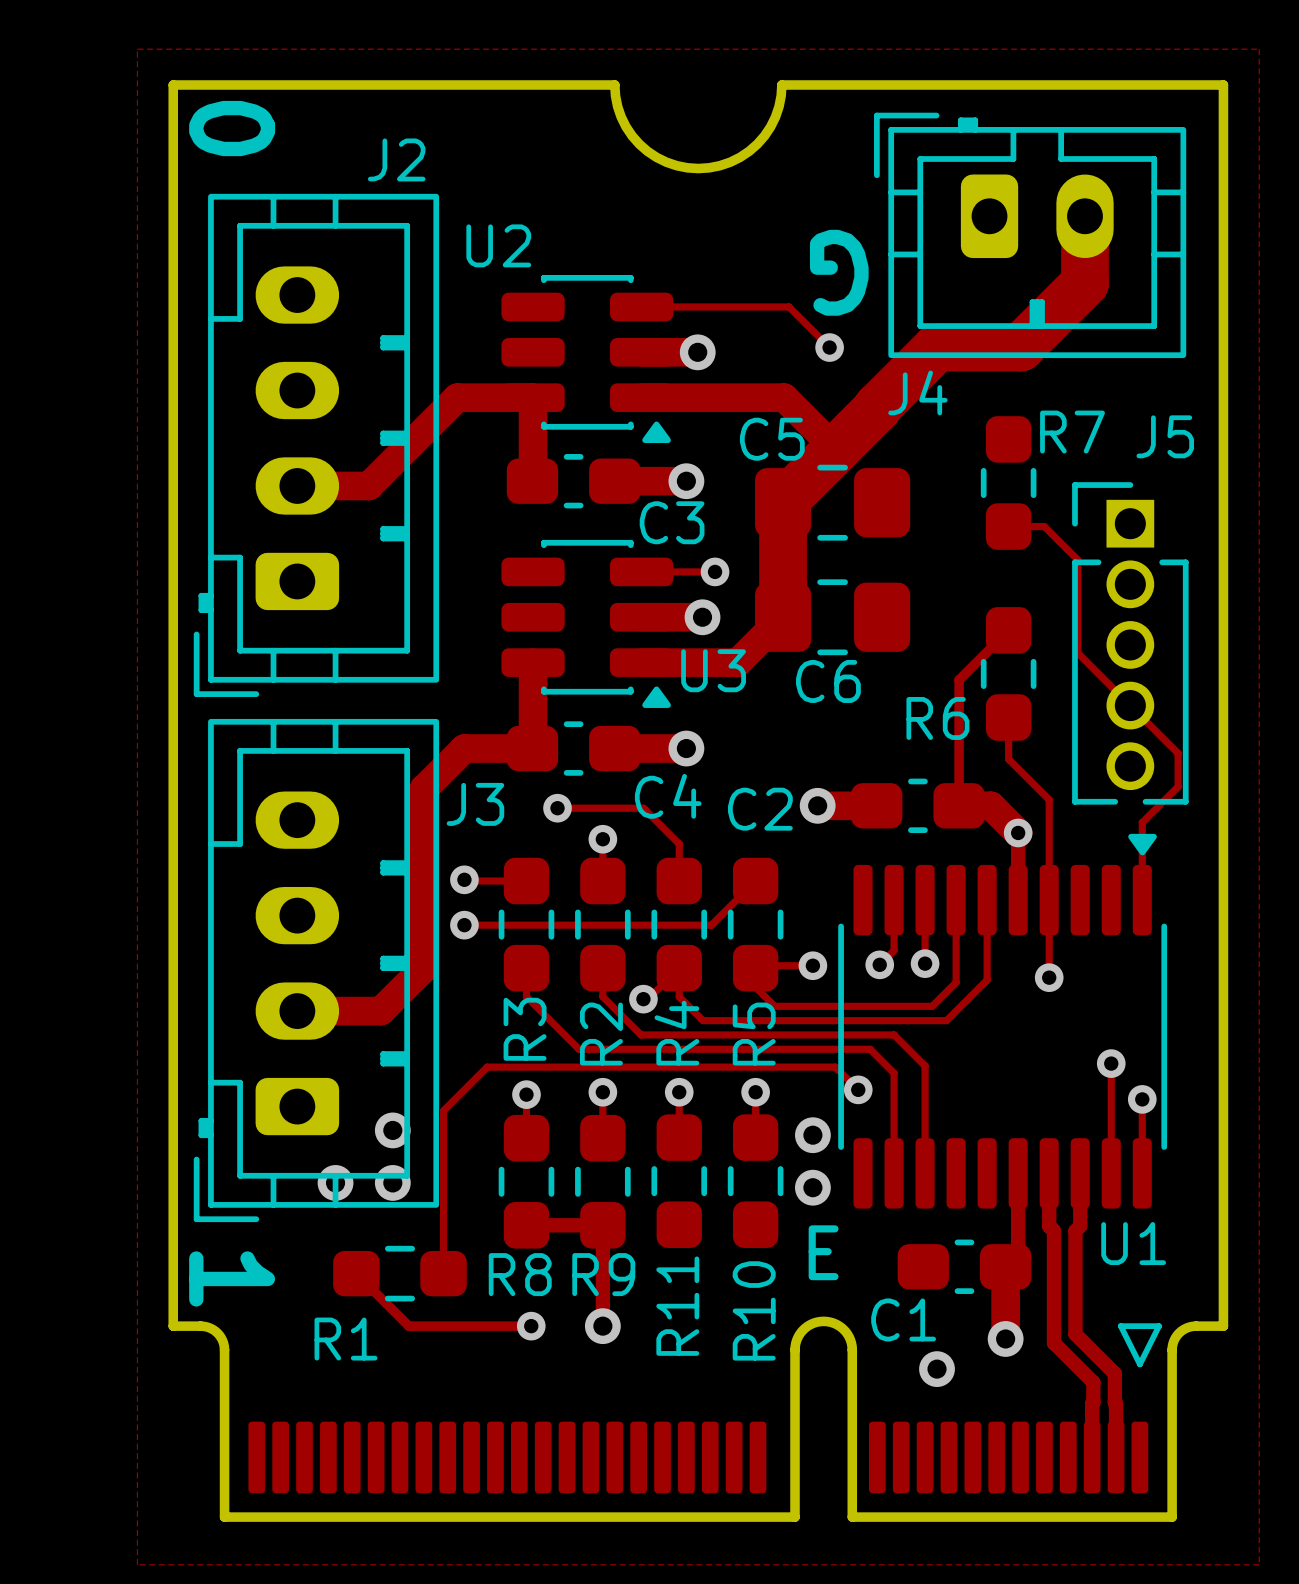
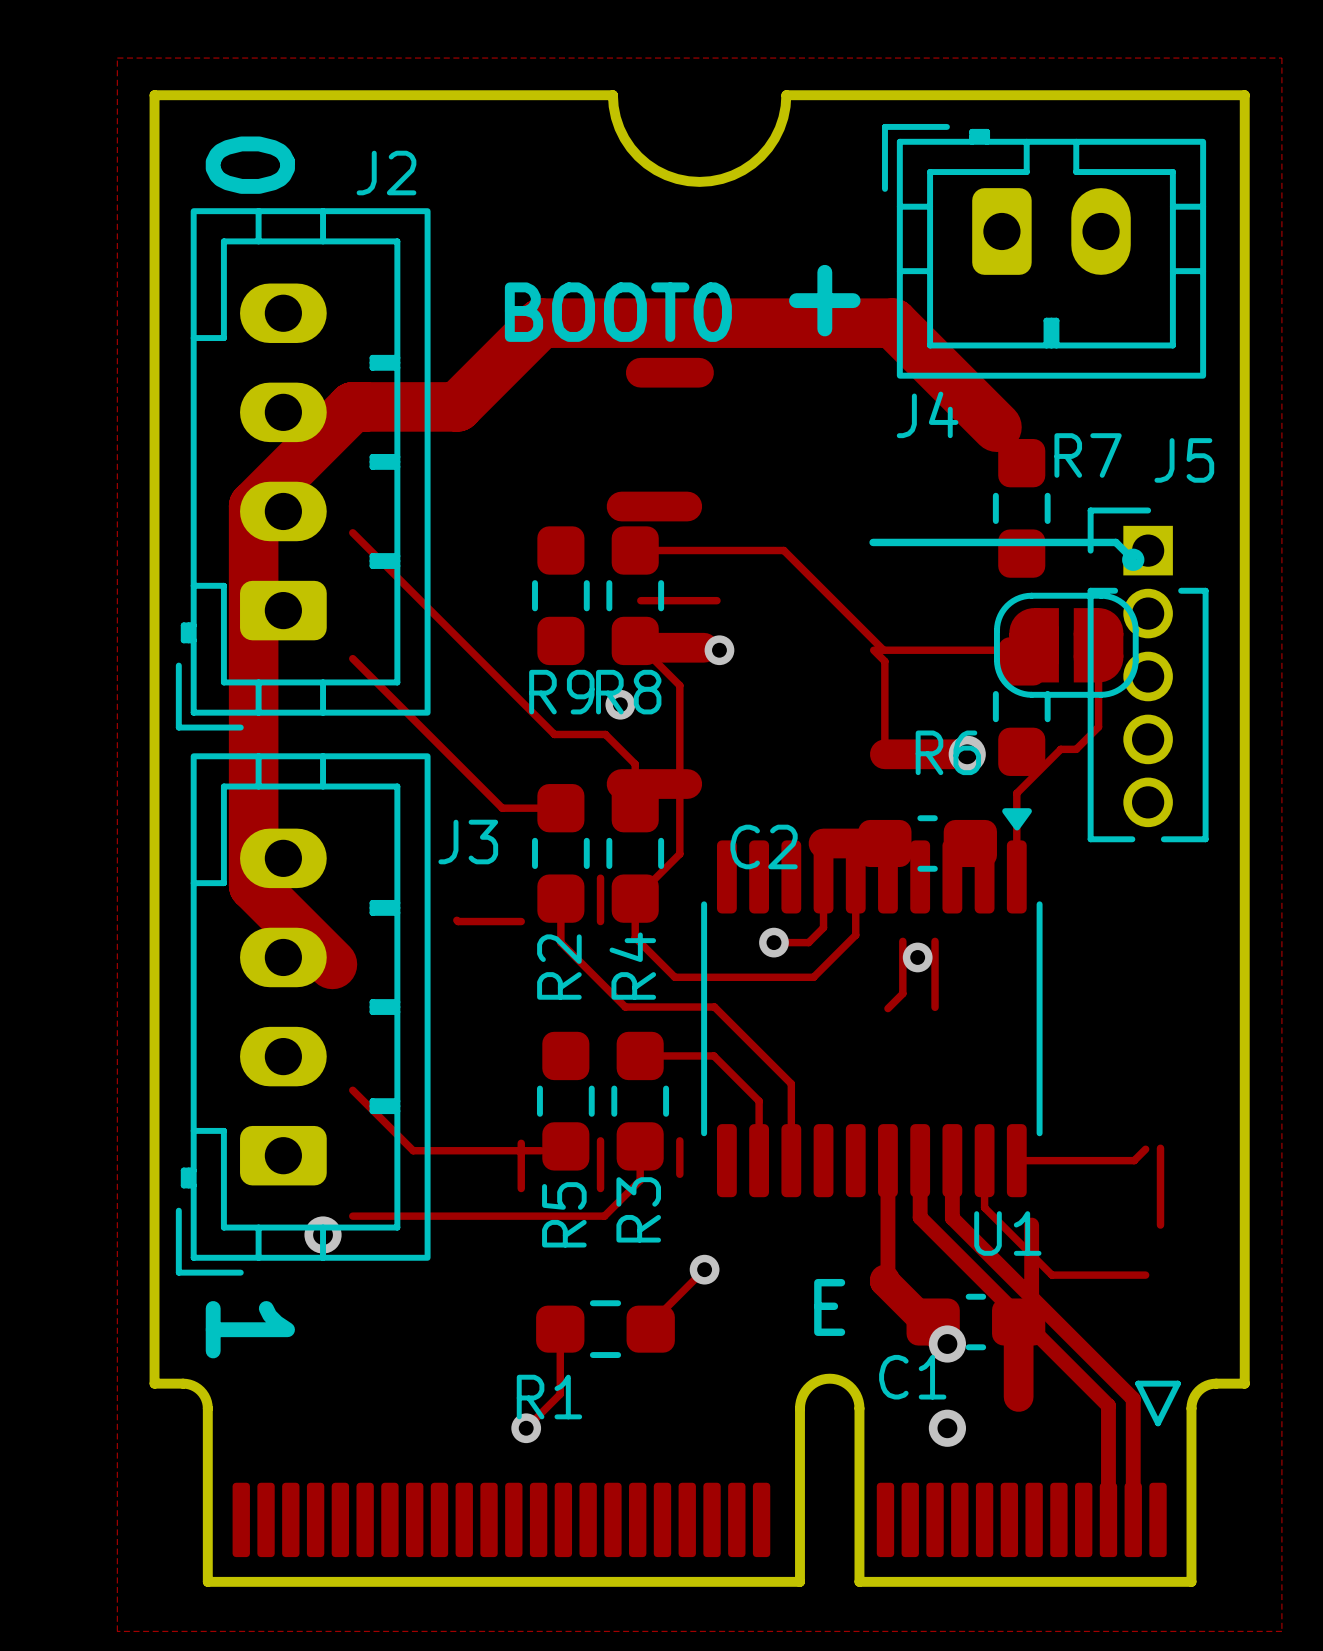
text position: 0 (232, 128) -> 0 (250, 165)
track: (1085, 216) (1085, 283) (1020, 347) (937, 347) (783, 502) (783, 617) (737, 662) (641, 662) -> none
text: G (839, 272) -> none
text: none -> + (824, 300)
text: none -> BOOT0 (618, 312)
track: (641, 306) (789, 306) (829, 347) -> none
via: (829, 347) -> none
via: (697, 352) -> none
U2: (587, 359) -> none
track: (641, 397) (784, 397) (836, 449) -> none
track: none -> (996, 427) (892, 323) (541, 323) (457, 406) (352, 406) (253, 506) (253, 885) (332, 964)
track: (533, 481) (533, 397) (457, 397) (368, 485) (297, 485) -> none
C3: (573, 481) -> none
via: (686, 481) -> none
C5: (832, 502) -> none
track: none -> (352, 532) (554, 734) (605, 734) (635, 764) (635, 808)
line: none -> (873, 542) (1115, 542) (1133, 559)
drawing: none -> [1122, 548, 1145, 571]
track: none -> (635, 550) (783, 550) (883, 650) (1029, 650) (1034, 645)
track: (1008, 526) (1044, 526) (1077, 559) (1077, 653) (1178, 753) (1178, 786) (1142, 822) (1142, 900) -> none
via position: (715, 571) -> (719, 650)
track: none -> (1098, 625) (1098, 727) (1076, 749) (1060, 749) (1016, 793) (1016, 876)
track: none -> (635, 640) (679, 685) (679, 854) (635, 898) (635, 937) (674, 977) (813, 977) (855, 935) (855, 876)
part: none -> (1066, 645)
via: (702, 617) -> none
C6: (832, 617) -> none
track: none -> (873, 650) (884, 661) (884, 754) (967, 754)
U3: (587, 623) -> none
track: none -> (352, 658) (502, 808) (560, 808)
track: (1008, 630) (959, 679) (959, 805) (991, 805) (1018, 832) (1018, 900) -> none
track: (533, 662) (533, 748) (464, 748) (423, 789) (423, 968) (380, 1011) (297, 1011) -> none
via: none -> (620, 704)
track: (1008, 717) (1008, 759) (1049, 799) (1049, 977) -> none
via: none -> (967, 754)
C4: (573, 748) -> none
via: (686, 748) -> none
via: (817, 805) -> none
track: (557, 808) (643, 808) (679, 844) (679, 881) -> none
via: (557, 808) -> none
via: (1018, 832) -> none
track: none -> (823, 876) (823, 927) (808, 942) (773, 942)
via: (602, 839) -> none
track: none -> (560, 898) (560, 942) (625, 1007) (714, 1007) (791, 1083) (791, 1160)
via: (464, 879) -> none
track: (755, 881) (711, 925) (464, 925) -> none
track: (956, 900) (956, 982) (932, 1006) (774, 1006) (755, 987) (755, 968) (758, 965) (812, 965) -> none
track: (987, 900) (987, 980) (946, 1020) (703, 1020) (679, 996) (679, 968) (648, 999) (643, 999) -> none
via: none -> (773, 942)
via: none -> (917, 957)
R3 position: (526, 924) -> (640, 1101)
R2 position: (602, 924) -> (560, 853)
R4 position: (679, 924) -> (635, 853)
R5 position: (755, 924) -> (565, 1101)
via: (464, 925) -> none
via: (925, 963) -> none
via: (879, 964) -> none
via: (812, 965) -> none
track: (526, 968) (526, 996) (578, 1049) (870, 1049) (894, 1073) (894, 1173) -> none
track: (602, 968) (602, 996) (641, 1034) (894, 1034) (925, 1065) (925, 1173) -> none
via: (1049, 977) -> none
via: (643, 999) -> none
track: none -> (640, 1055) (713, 1055) (759, 1101) (759, 1140)
U1 position: (1002, 1021) -> (871, 1002)
track: none -> (352, 1090) (413, 1150) (541, 1150)
track: (1111, 1063) (1111, 1173) -> none
via: (1111, 1063) -> none
track: (858, 1089) (835, 1067) (487, 1067) (443, 1110) (443, 1249) -> none
via: (858, 1089) -> none
via: (602, 1092) -> none
via: (679, 1092) -> none
via: (755, 1092) -> none
via: (526, 1094) -> none
track: none -> (640, 1146) (640, 1180) (604, 1216) (352, 1216)
via: (1142, 1099) -> none
track: none -> (1145, 1149) (1134, 1160) (1016, 1160)
track: none -> (887, 1160) (887, 1276) (884, 1281) (947, 1344)
track: none -> (984, 1160) (984, 1207) (1051, 1275) (1145, 1275)
via: (392, 1130) -> none
via: (812, 1135) -> none
track: (1049, 1173) (1049, 1226) (1053, 1230) (1053, 1343) (1093, 1382) (1092, 1403) -> (920, 1160) (920, 1217) (1108, 1405) (1108, 1464)
track: (1080, 1173) (1080, 1226) (1075, 1230) (1075, 1334) (1114, 1373) (1116, 1403) -> (952, 1160) (952, 1218) (1133, 1399) (1133, 1464)
R8 position: (526, 1181) -> (635, 595)
R9 position: (602, 1181) -> (560, 595)
R11: (679, 1181) -> none
R10: (755, 1181) -> none
via: (392, 1182) -> none
via: (812, 1187) -> none
track: none -> (704, 1269) (650, 1323) (650, 1329)
via: none -> (704, 1269)
track: (526, 1225) (602, 1225) (602, 1326) -> none
track: (356, 1273) (408, 1326) (531, 1326) -> none
R1 position: (399, 1273) -> (605, 1329)
track: none -> (560, 1329) (560, 1394) (526, 1428)
text position: 1 (232, 1278) -> 1 (250, 1329)
via: none -> (947, 1344)
via position: (531, 1326) -> (526, 1428)
via: (602, 1326) -> none
via: (1005, 1338) -> none

